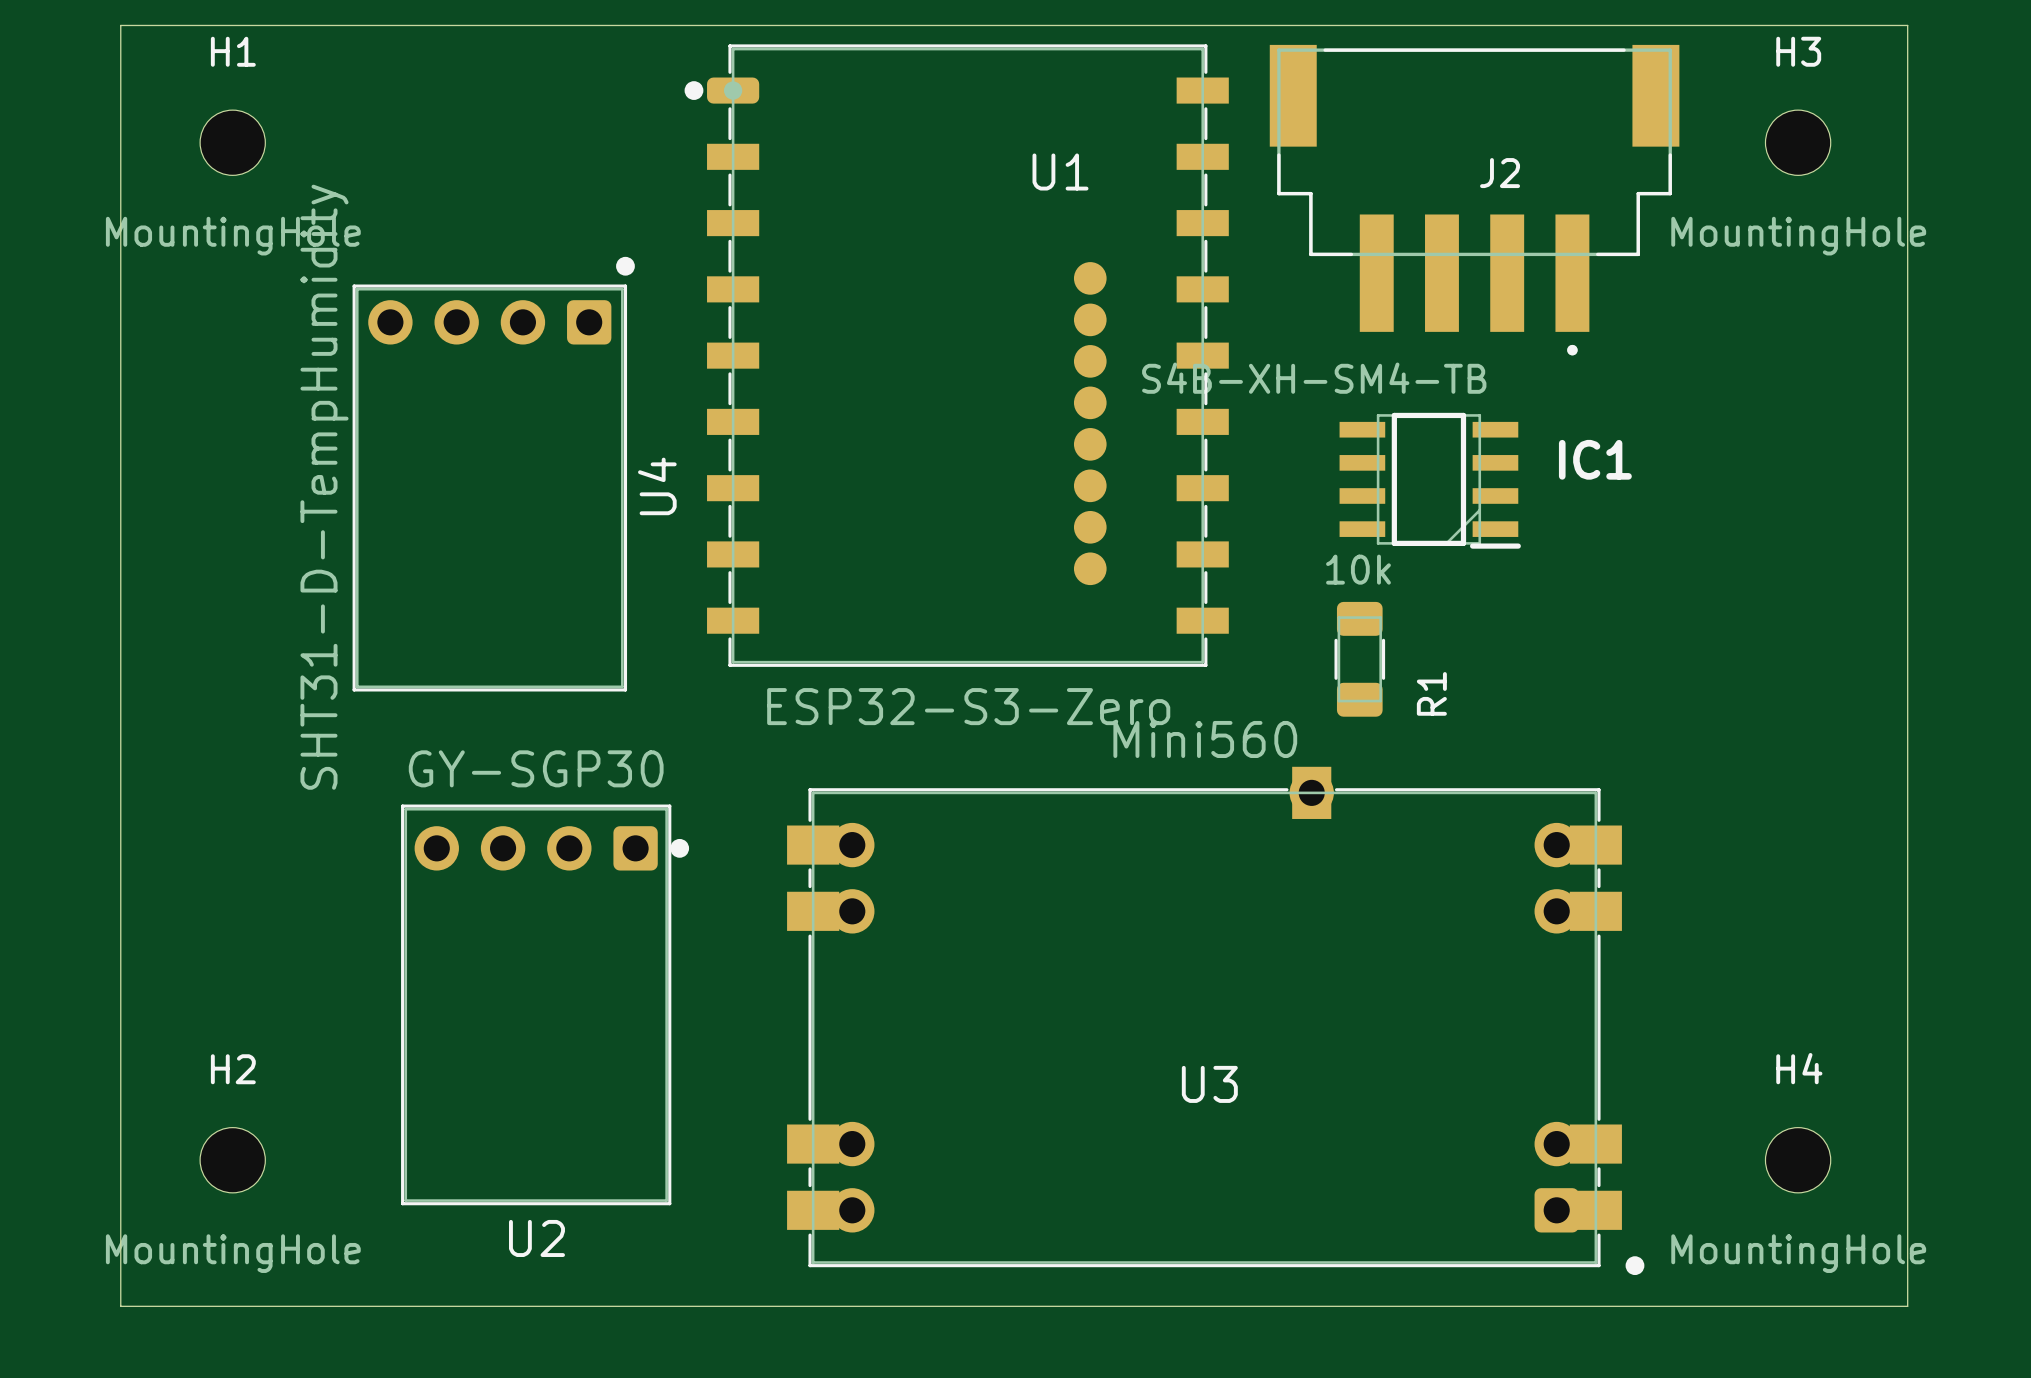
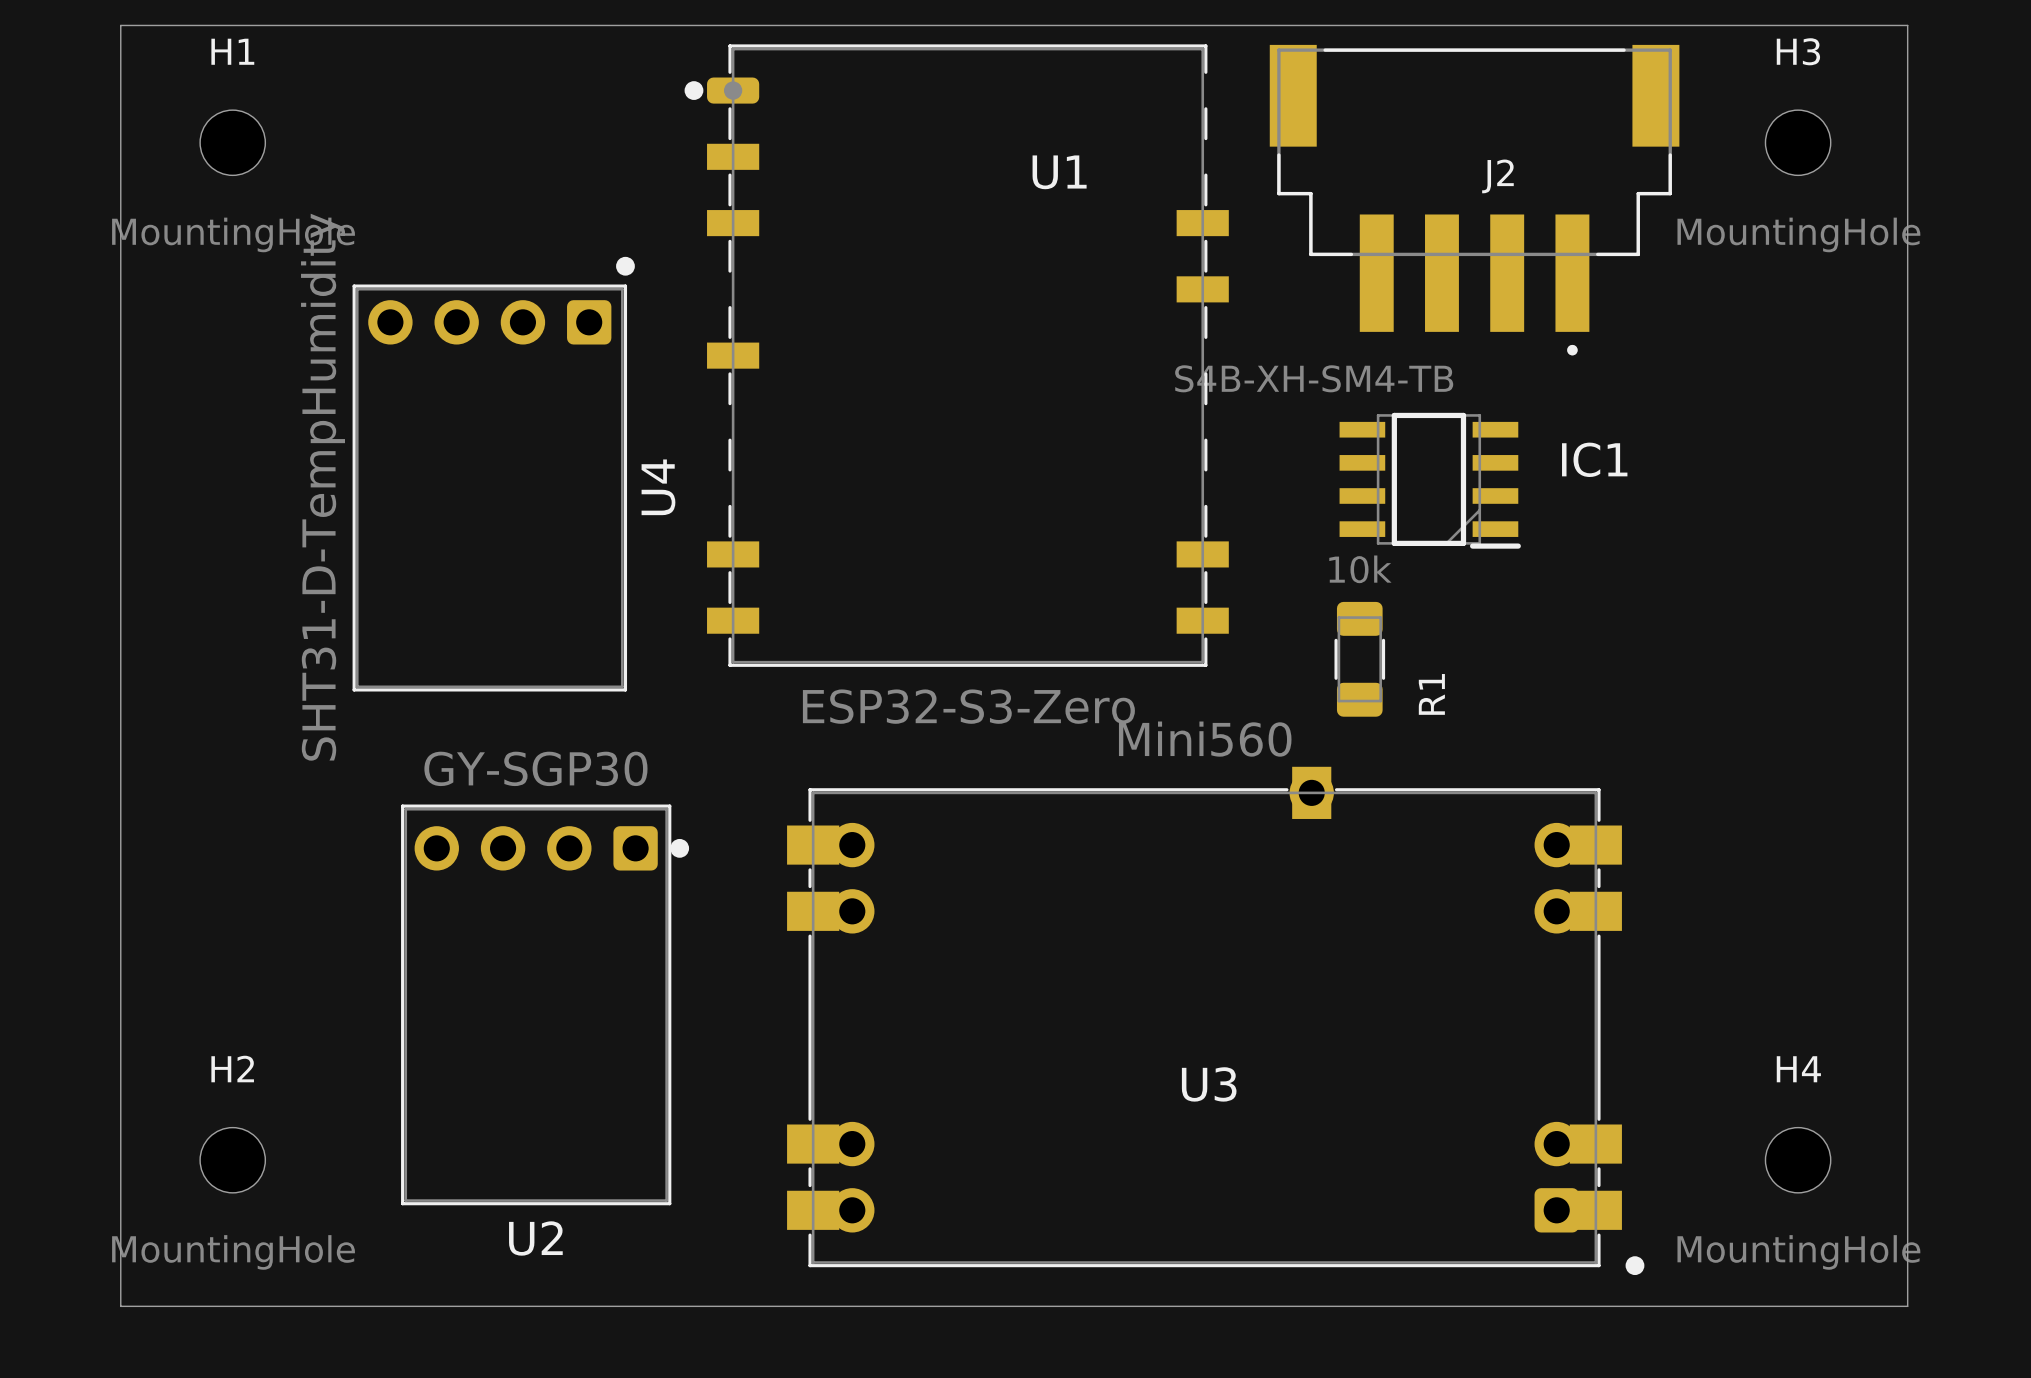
U1 footprint: [684, 44, 1229, 667] -> [684, 44, 1229, 667]

